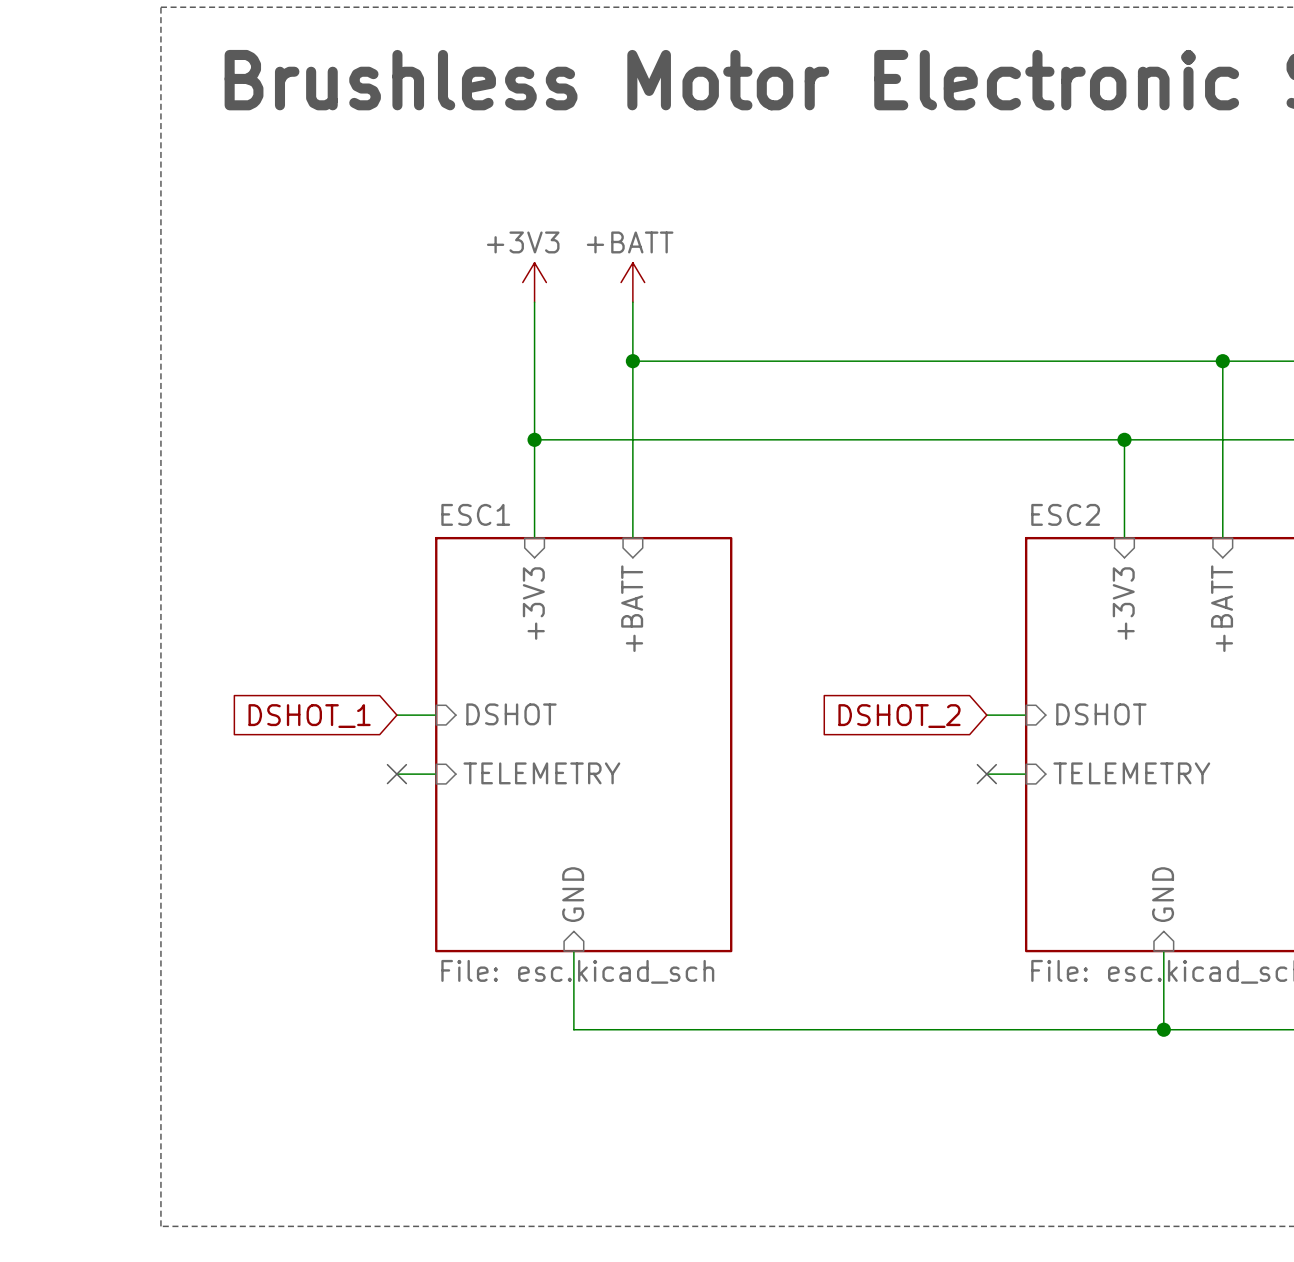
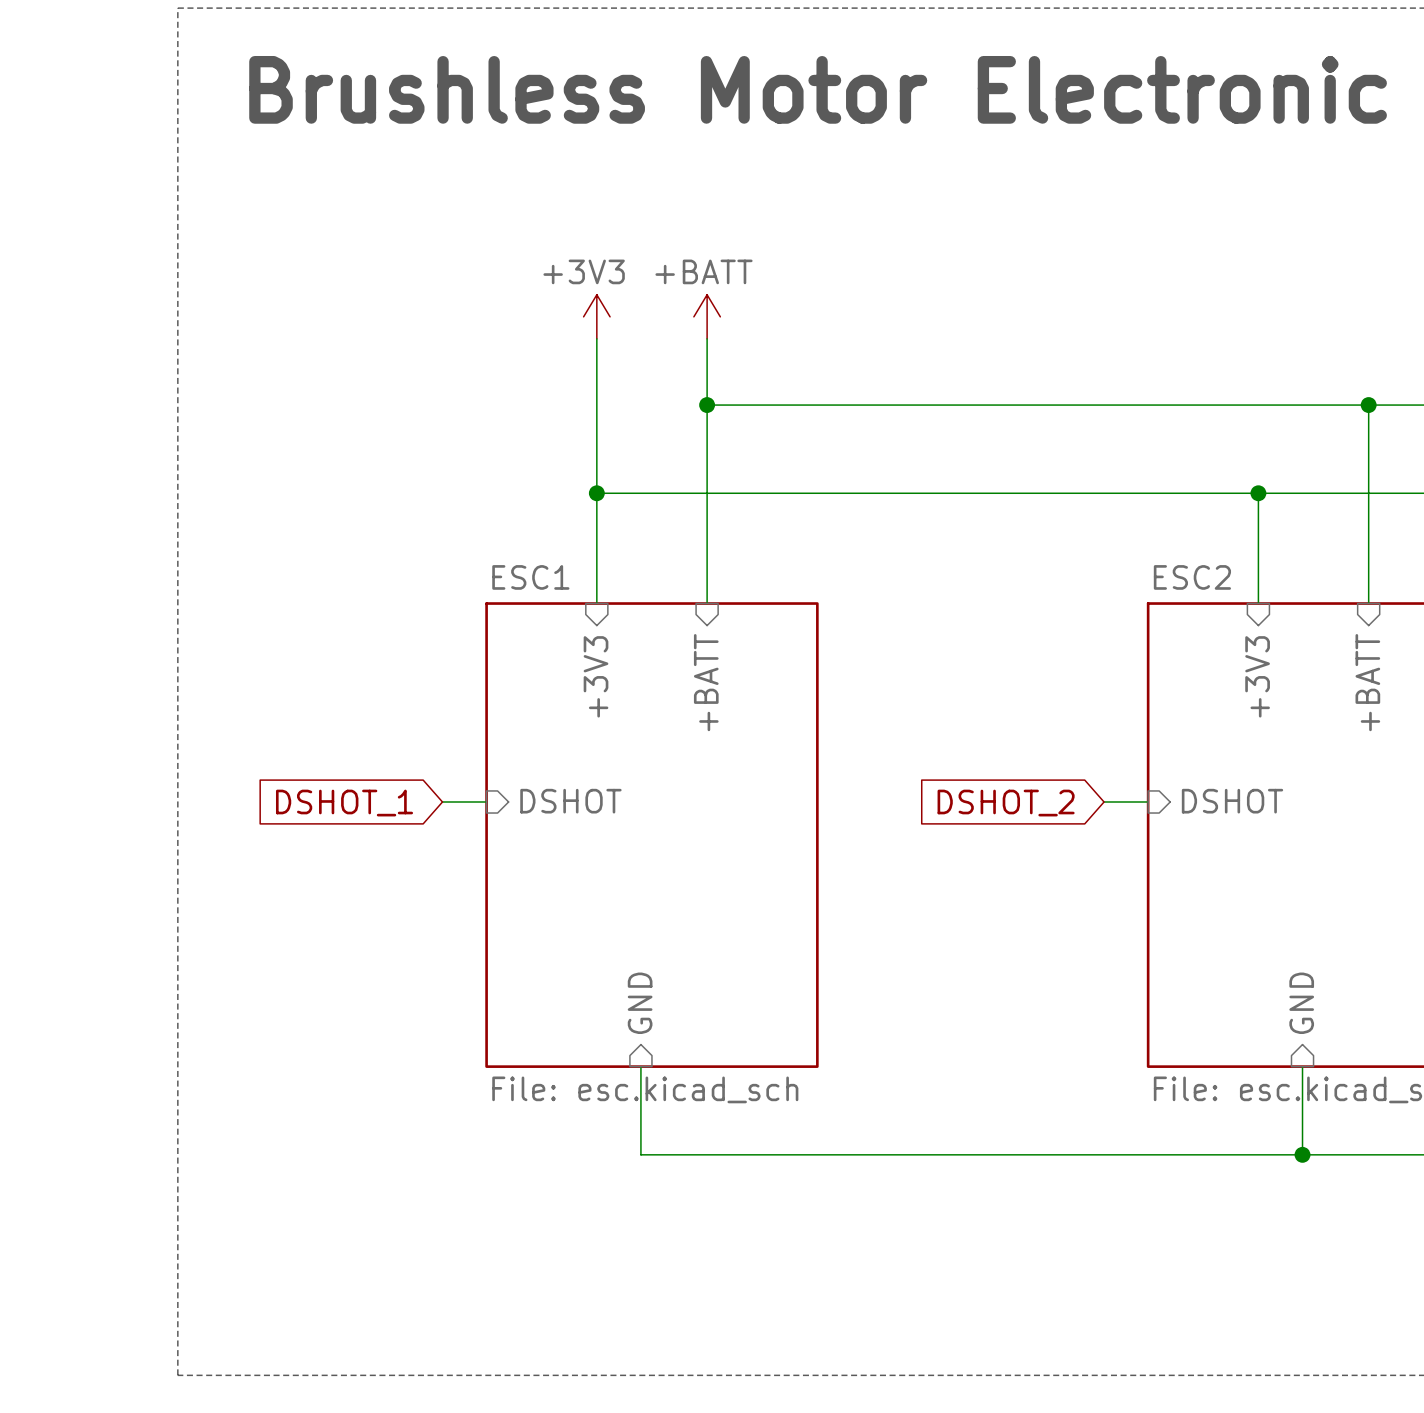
sheet pin: TELEMETRY (541, 773) -> none
sheet pin: TELEMETRY (1131, 773) -> none
wire: (396, 774) (436, 774) -> none
no-connect mark: (396, 774) -> none
wire: (986, 774) (1026, 774) -> none
no-connect mark: (986, 774) -> none

